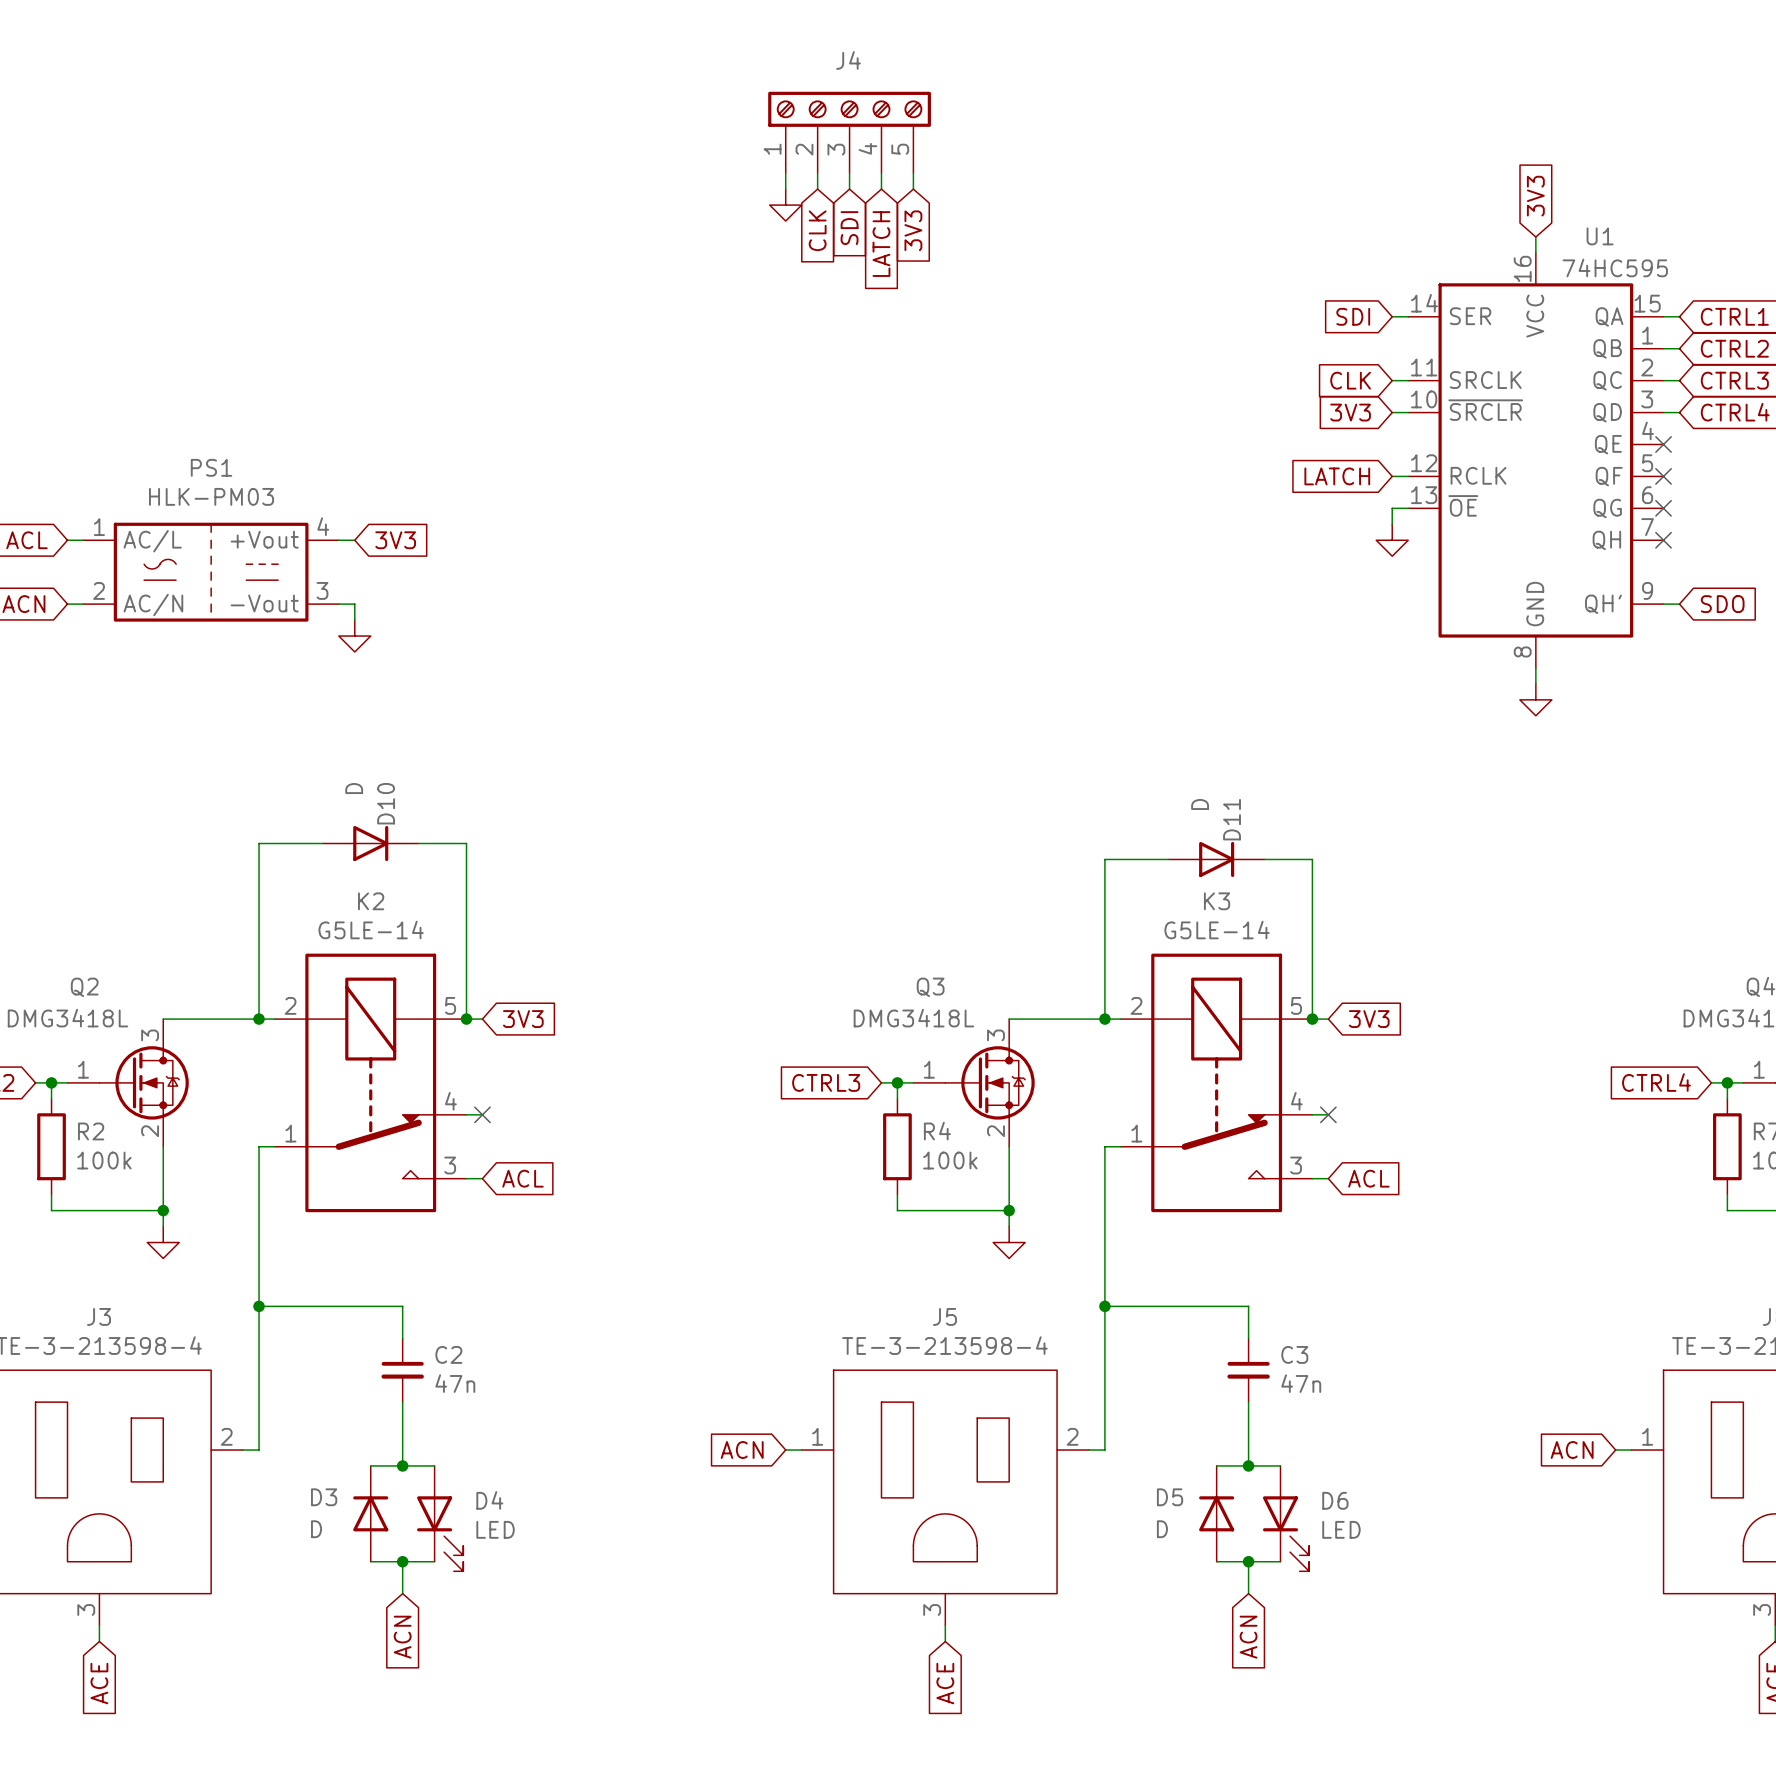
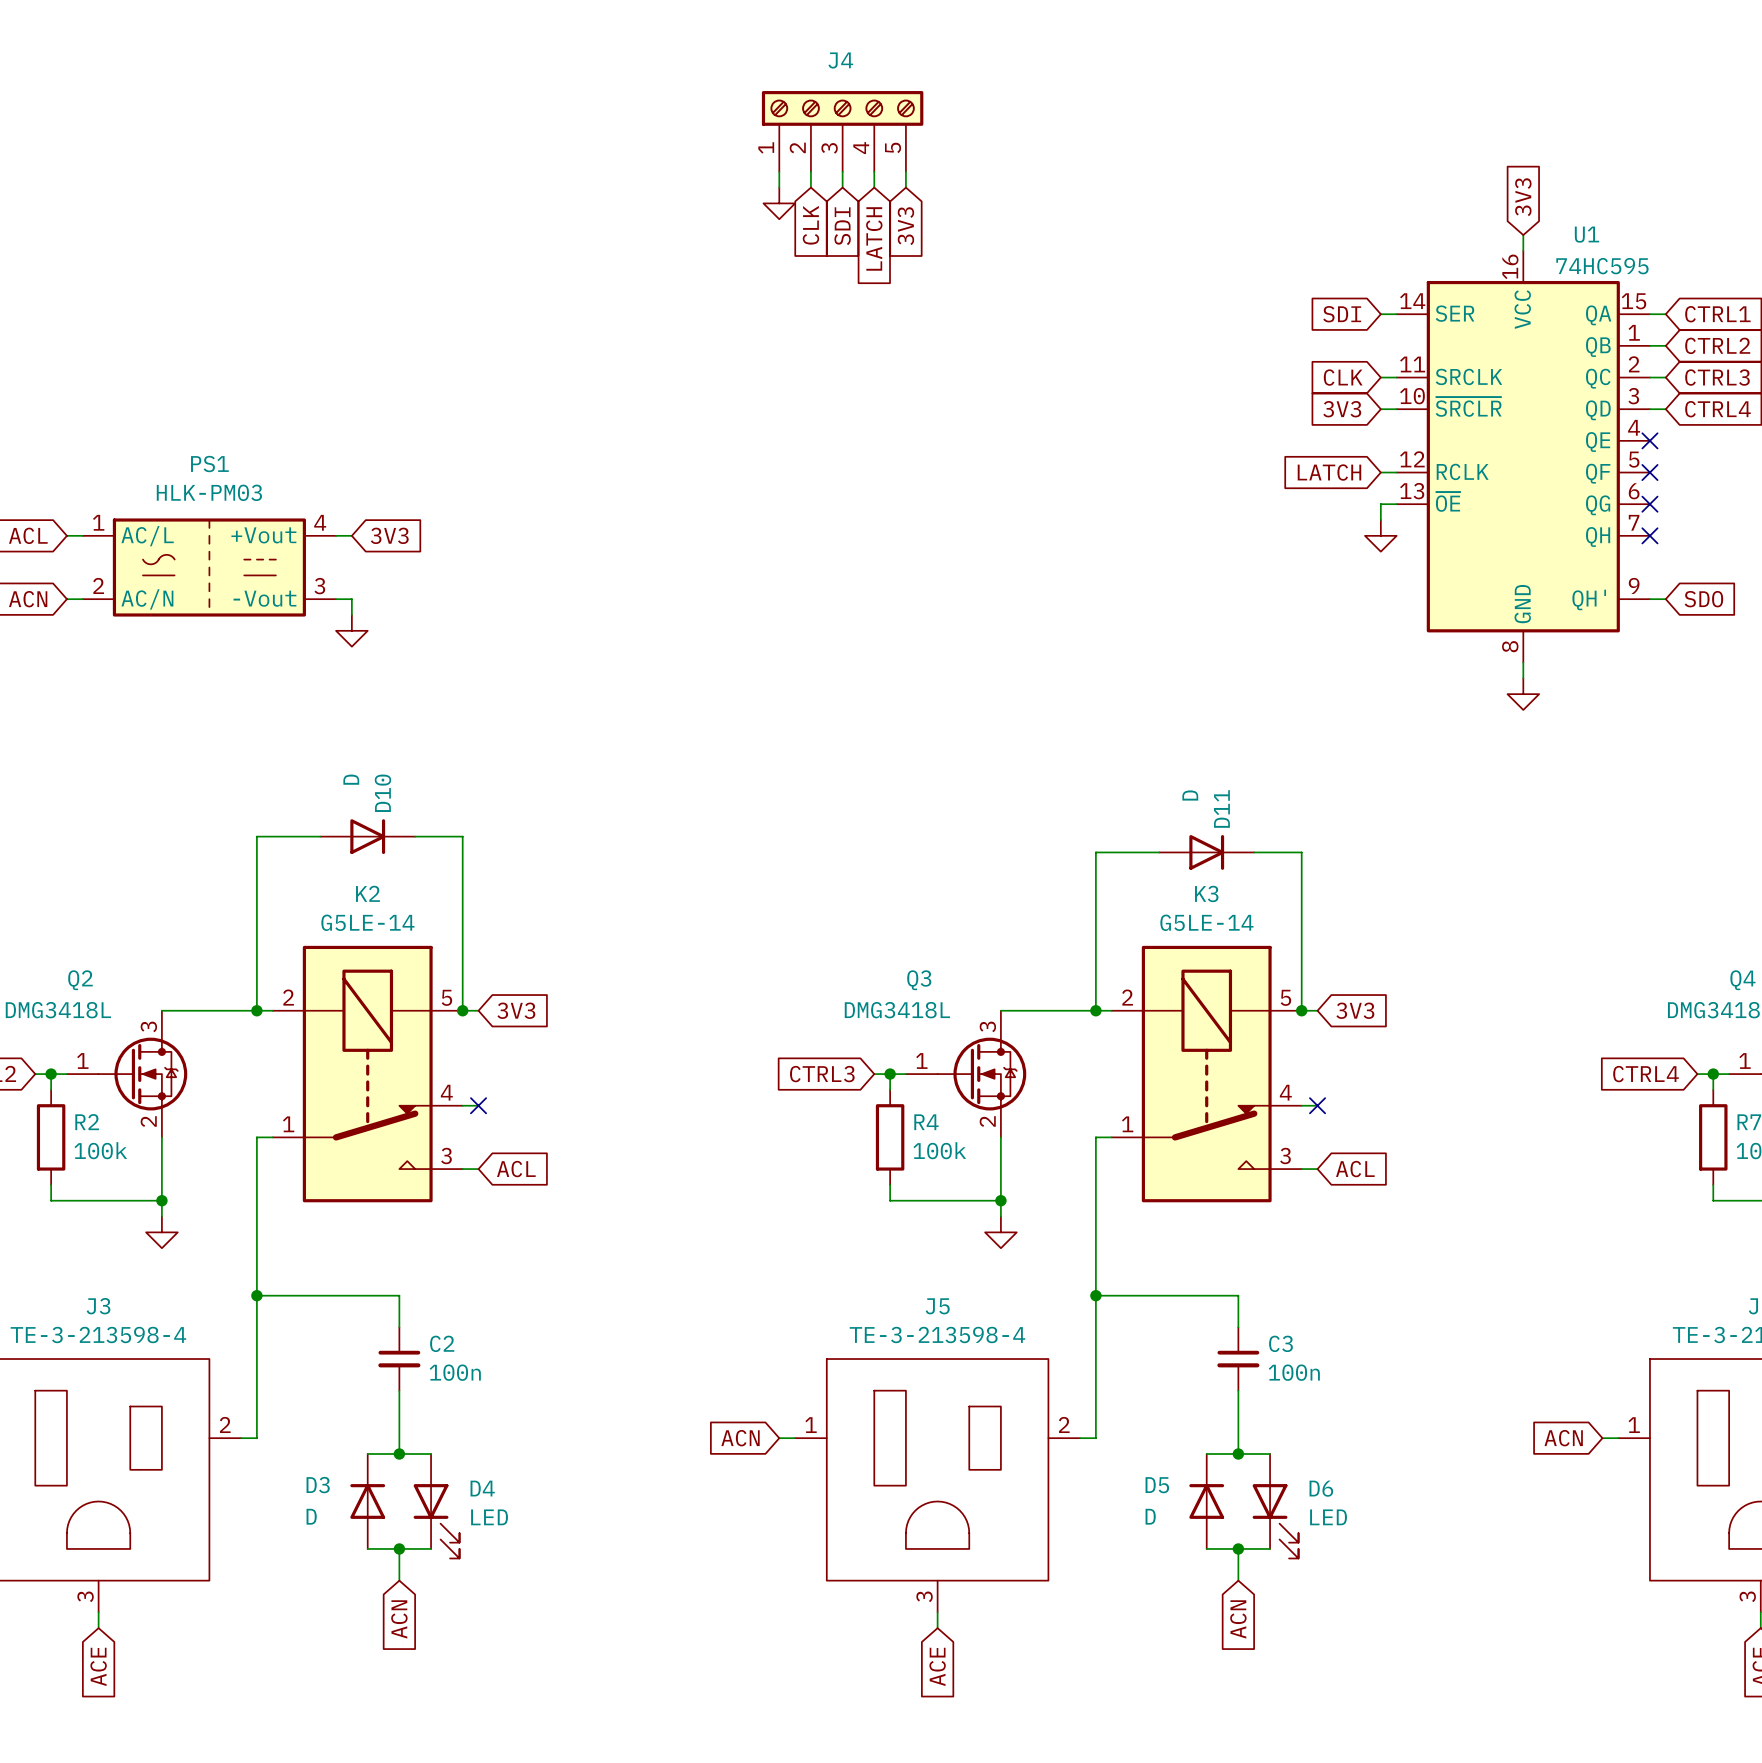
C2 value: 47n (455, 1383) -> 100n (455, 1372)
C3 value: 47n (1301, 1383) -> 100n (1294, 1372)

